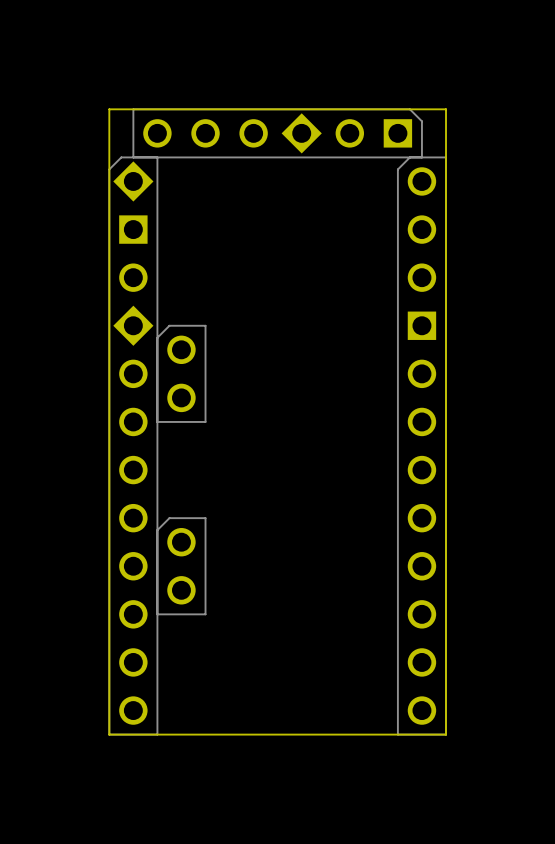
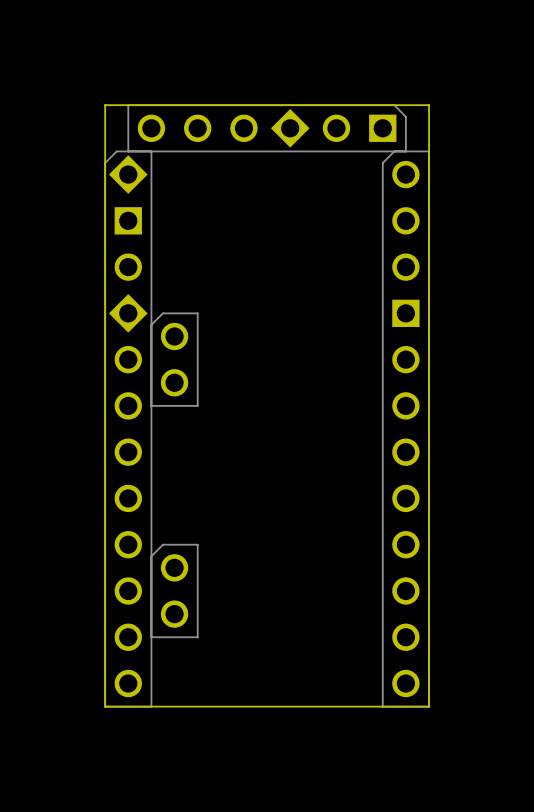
part position: (181, 566) -> (174, 590)

